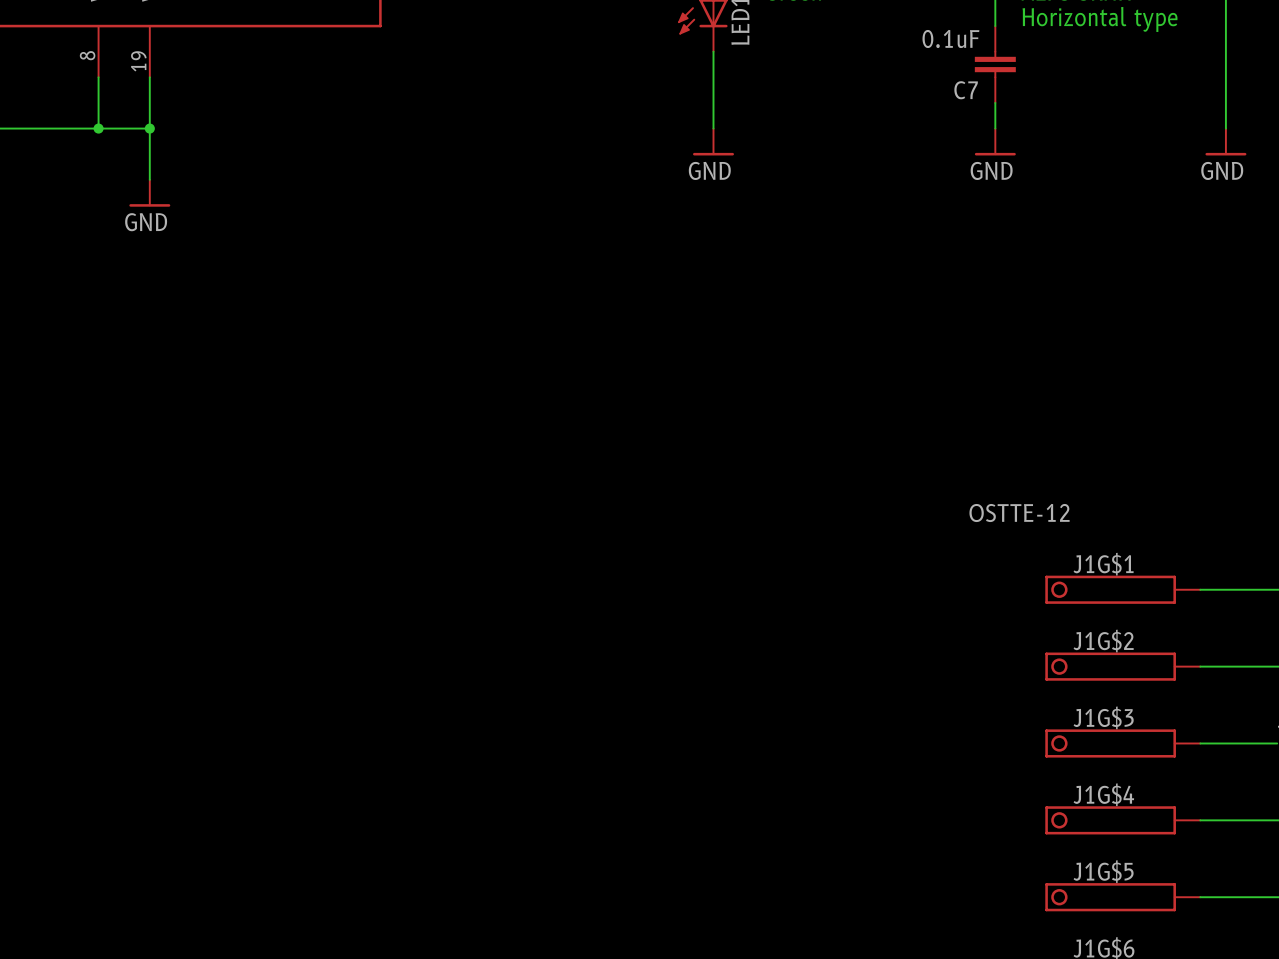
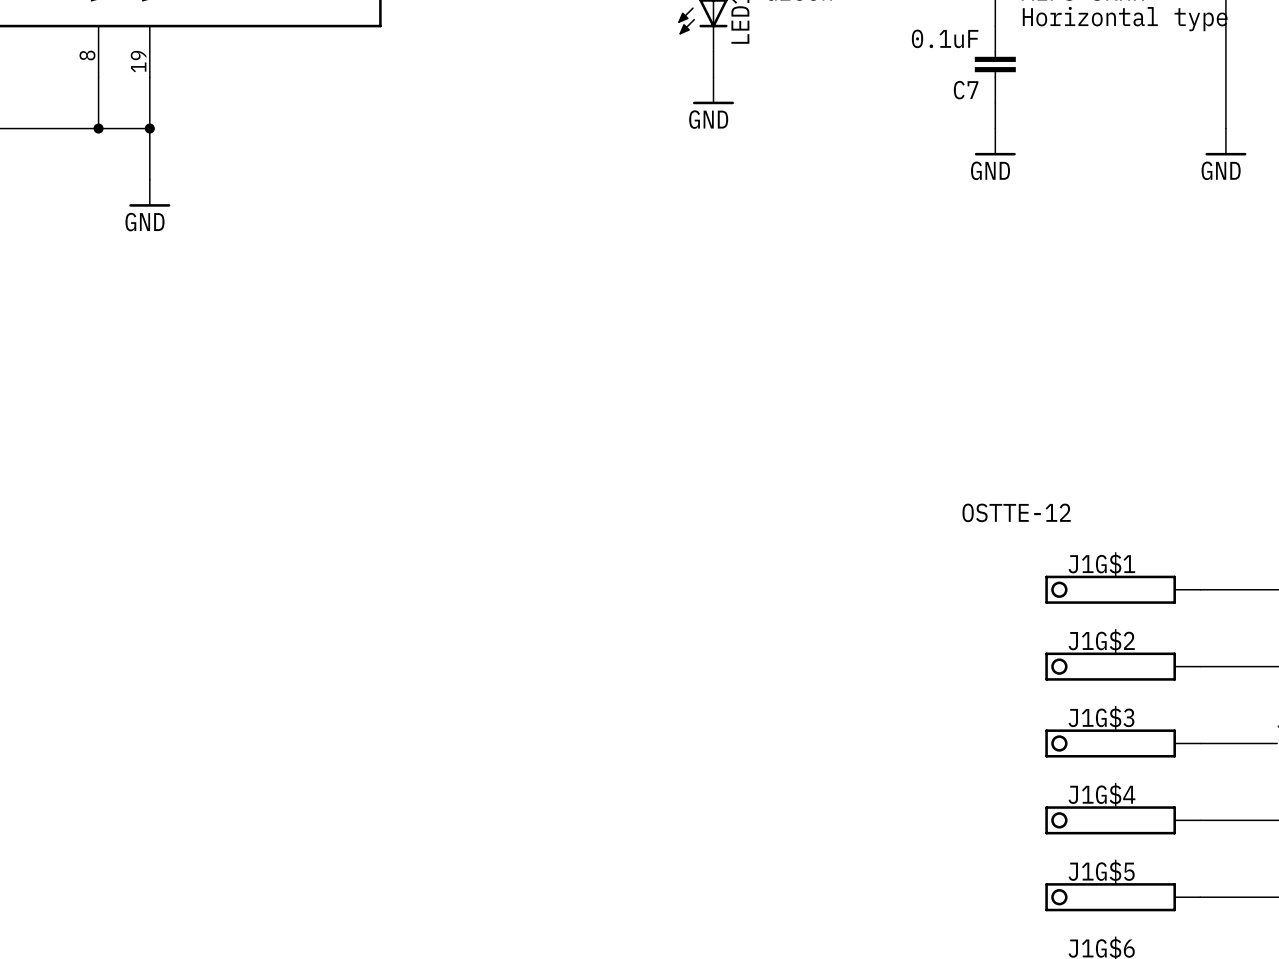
power symbol position: GND (713, 142) -> GND (713, 90)

